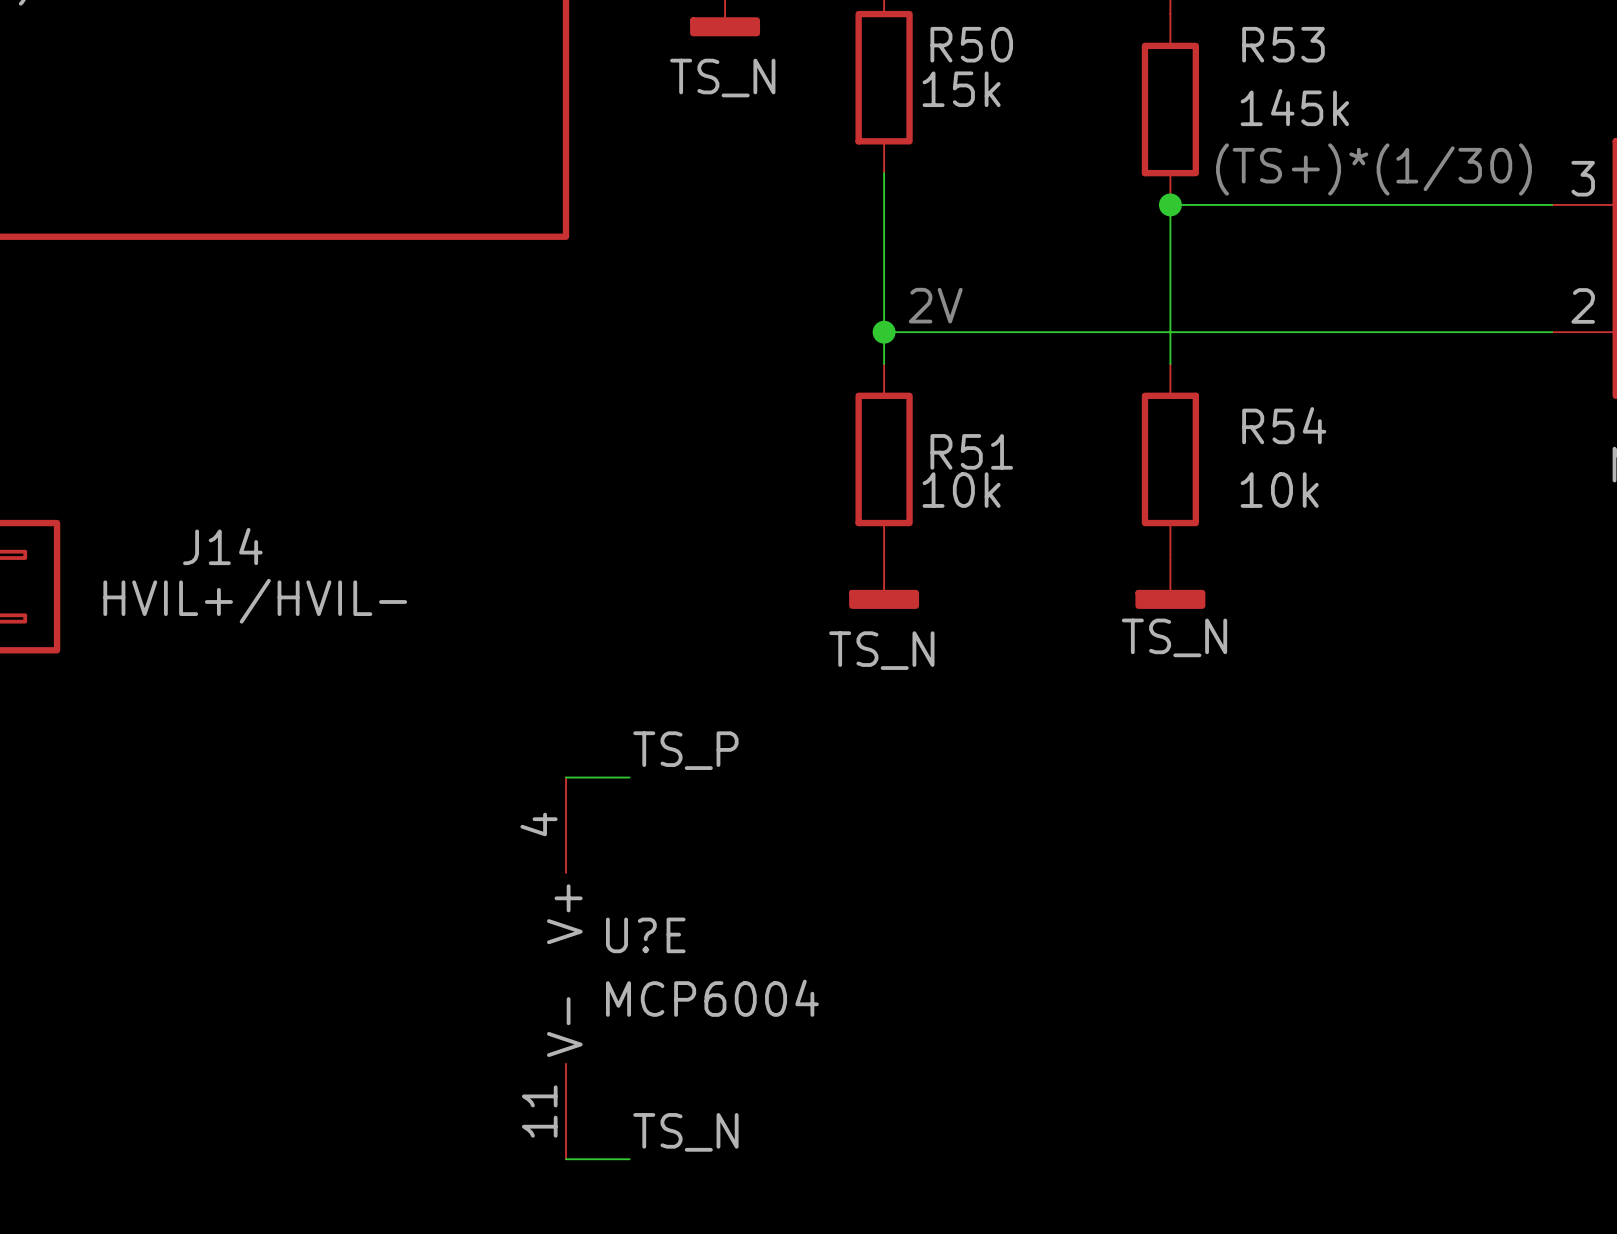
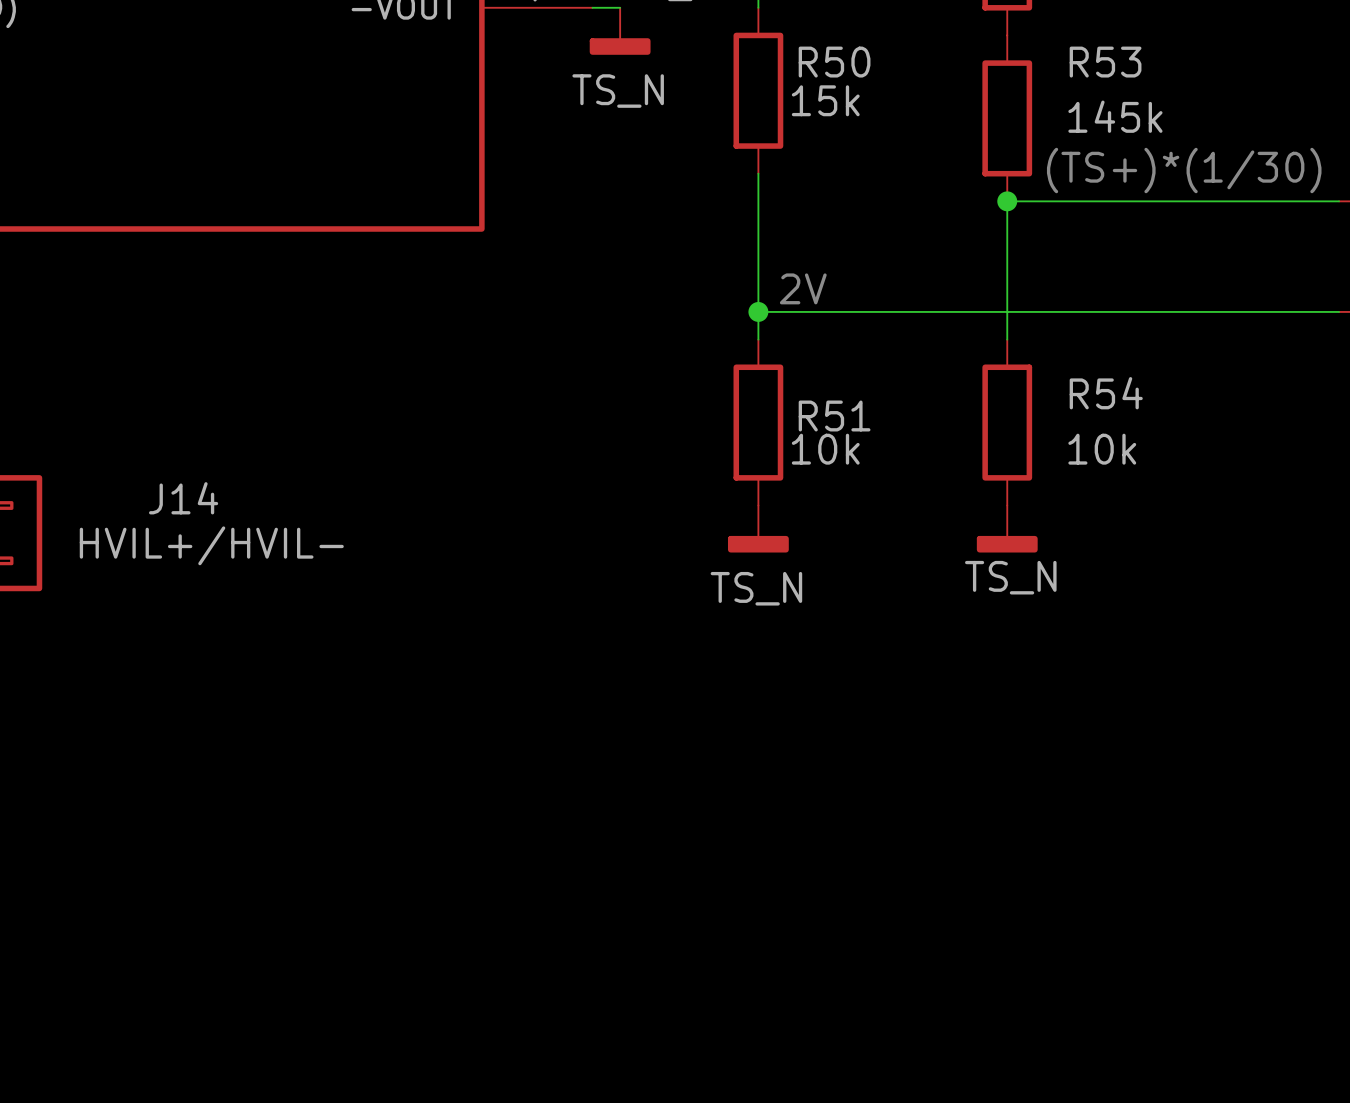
label: TS_P (685, 750) -> none
wire: (566, 777) (629, 777) -> none
U?E: MCP6004 (566, 968) -> none
label: TS_N (685, 1132) -> none
wire: (566, 1159) (629, 1159) -> none

